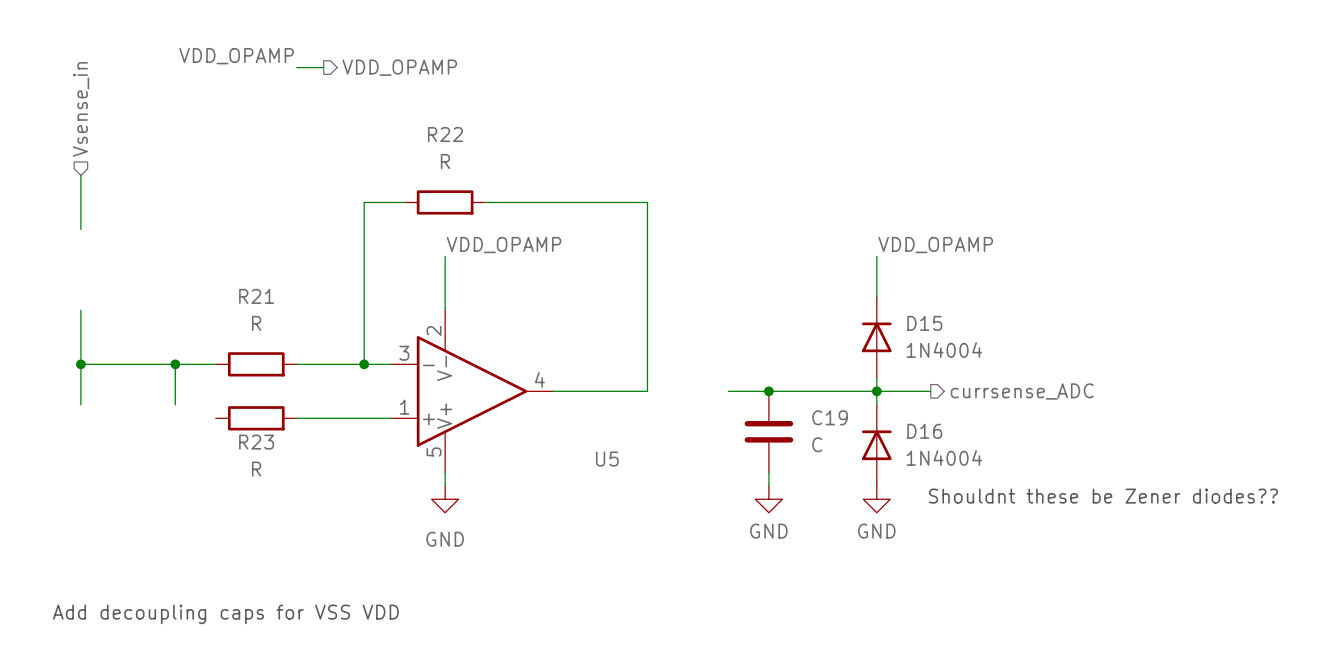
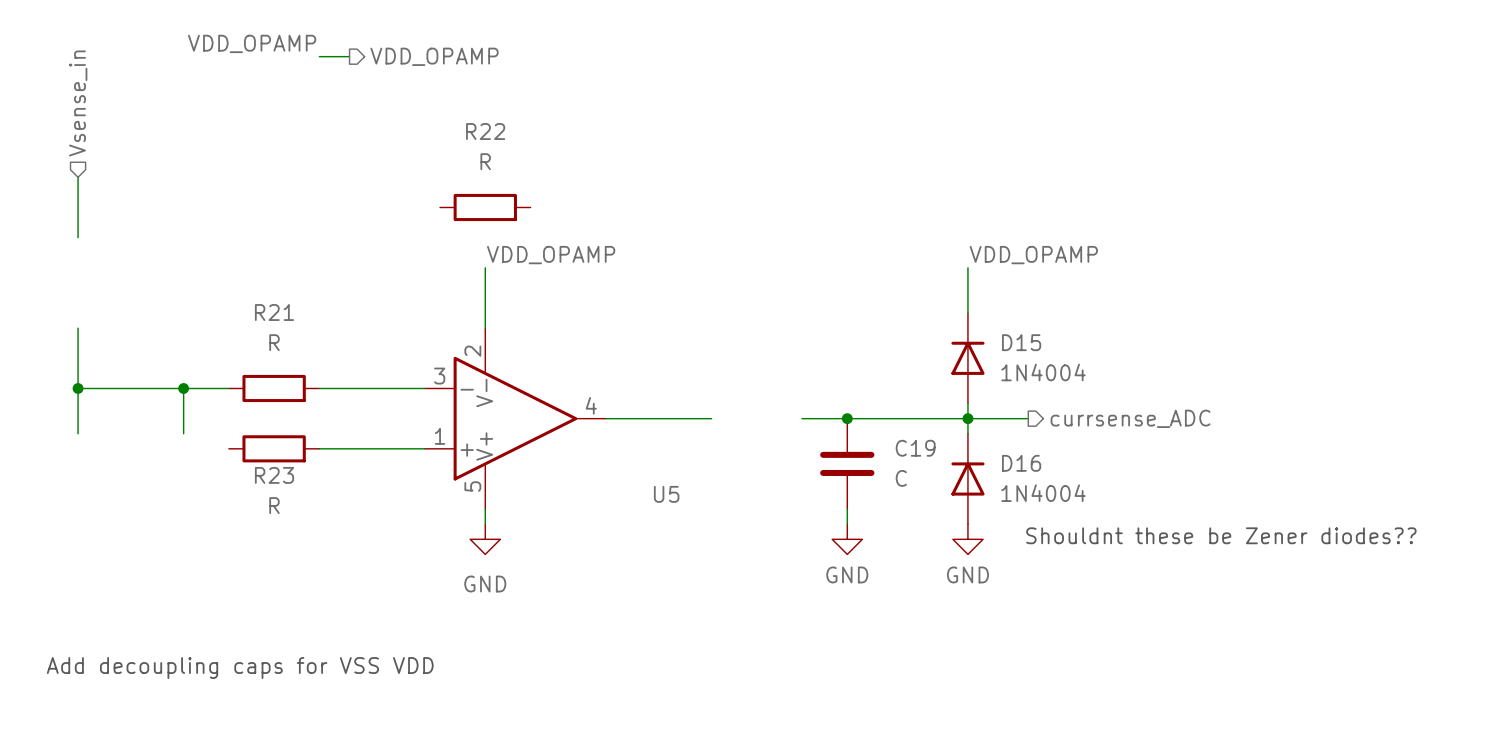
wire: (404, 202) (364, 202) (364, 364) -> none
wire: (485, 202) (647, 202) (647, 391) -> none
junction: (364, 364) -> none

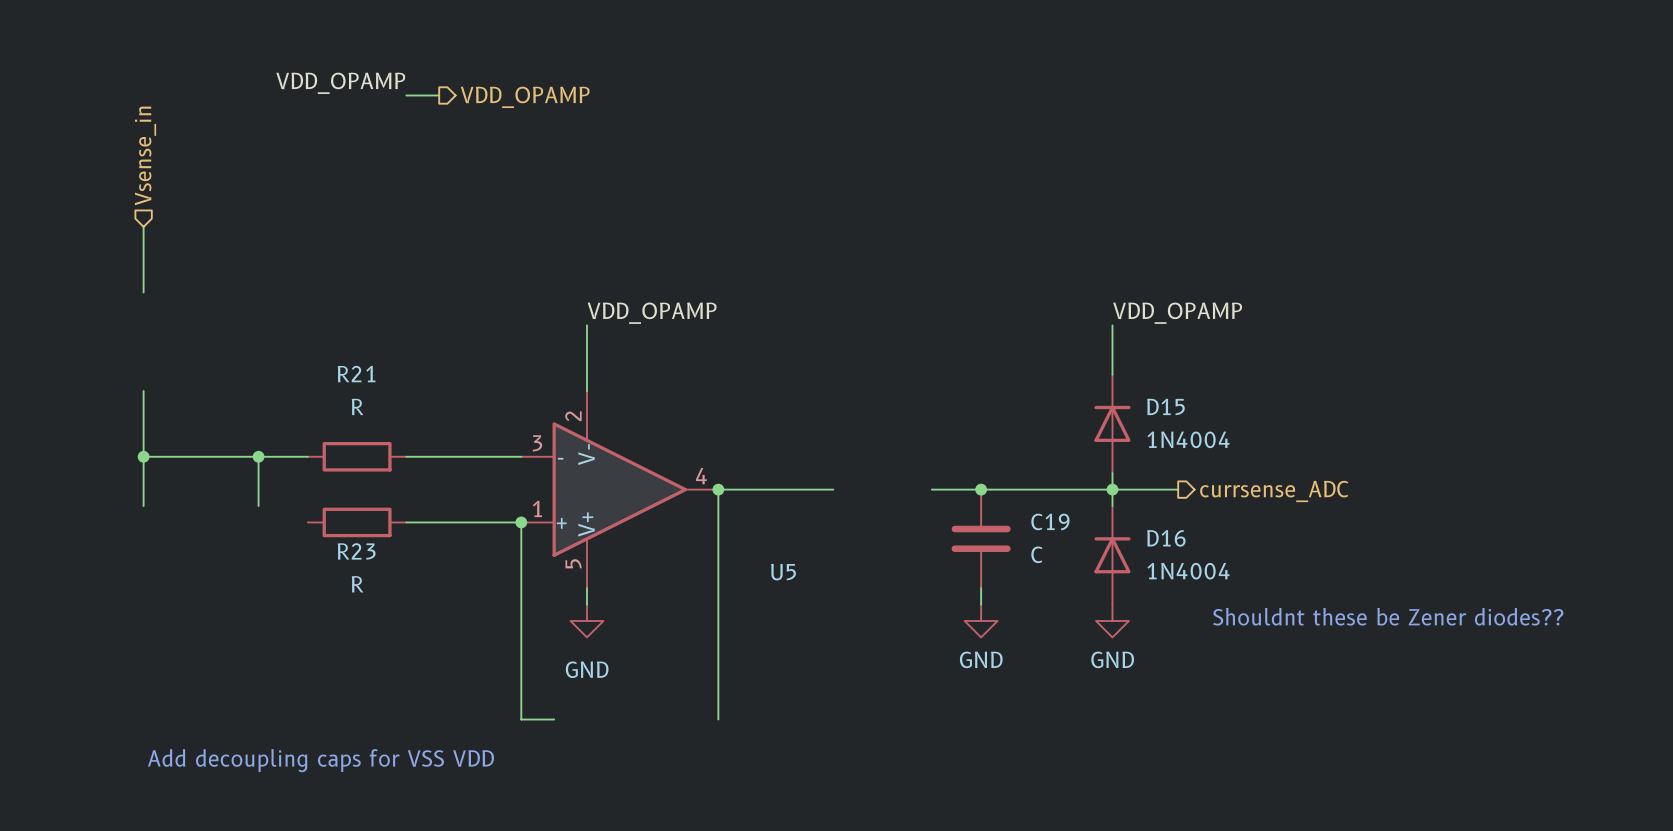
R22: R (485, 207) -> none
wire: none -> (718, 489) (718, 719)
junction: none -> (718, 489)
wire: none -> (521, 522) (521, 719) (554, 719)
junction: none -> (521, 522)

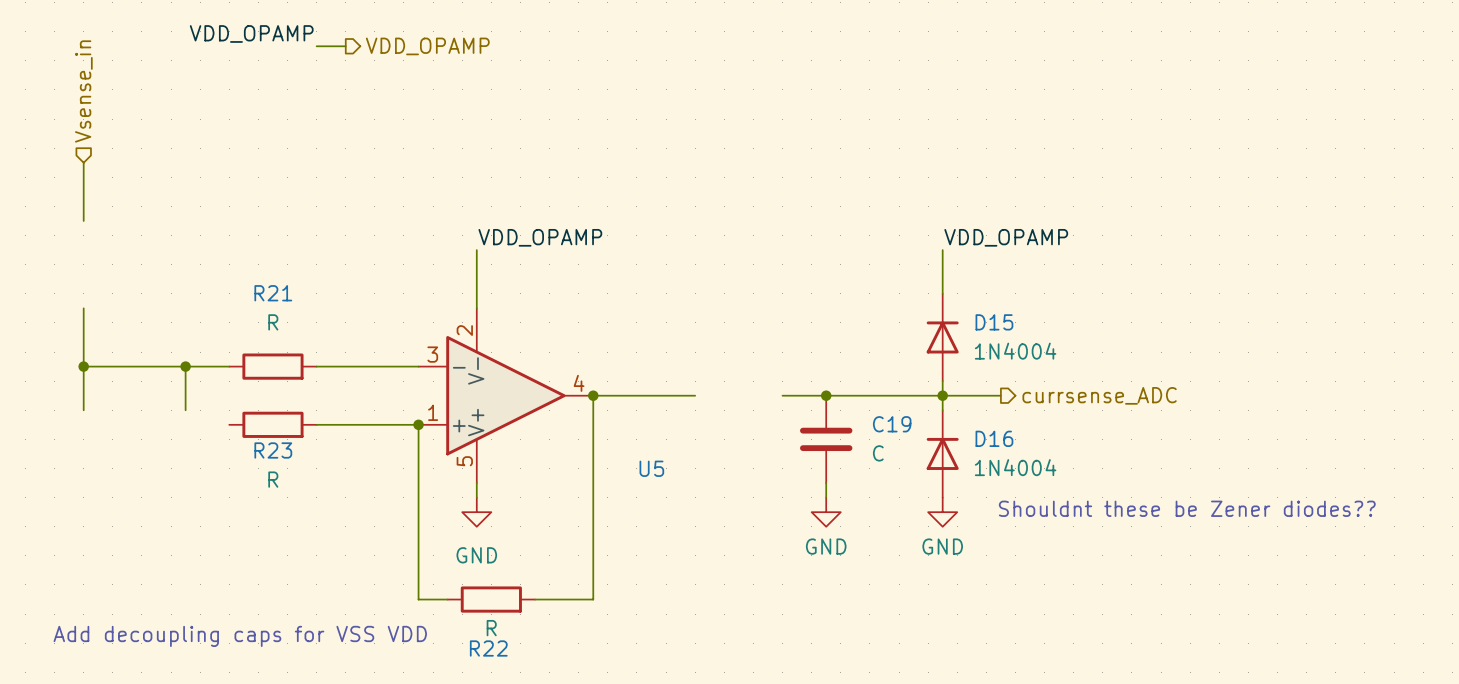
R22: none -> R (491, 599)
wire: none -> (535, 599) (593, 599)

